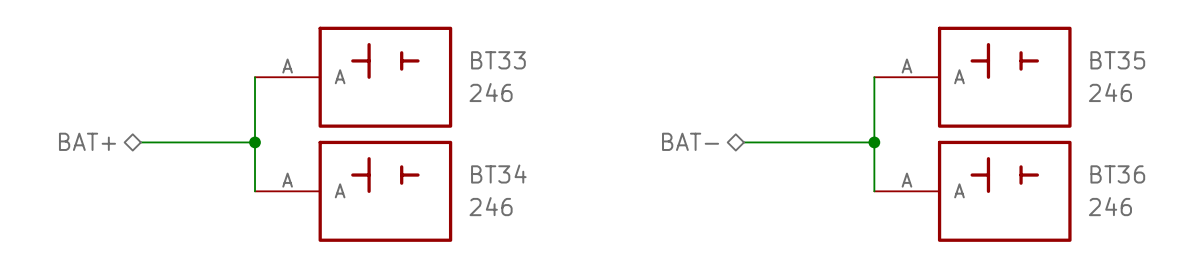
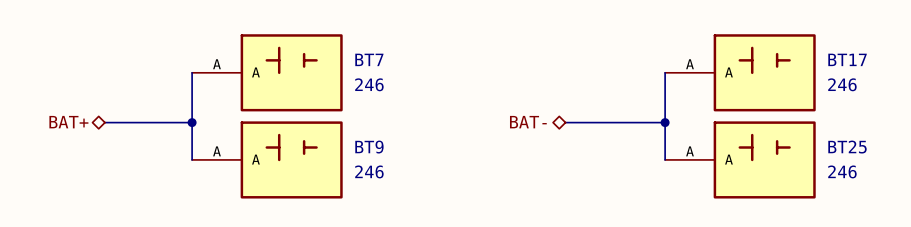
BT33 name: BT33 (498, 60) -> BT7 (369, 59)
BT35 name: BT35 (1117, 60) -> BT17 (847, 59)
BT34 name: BT34 (498, 174) -> BT9 (369, 147)
BT36 name: BT36 (1117, 174) -> BT25 (847, 147)

